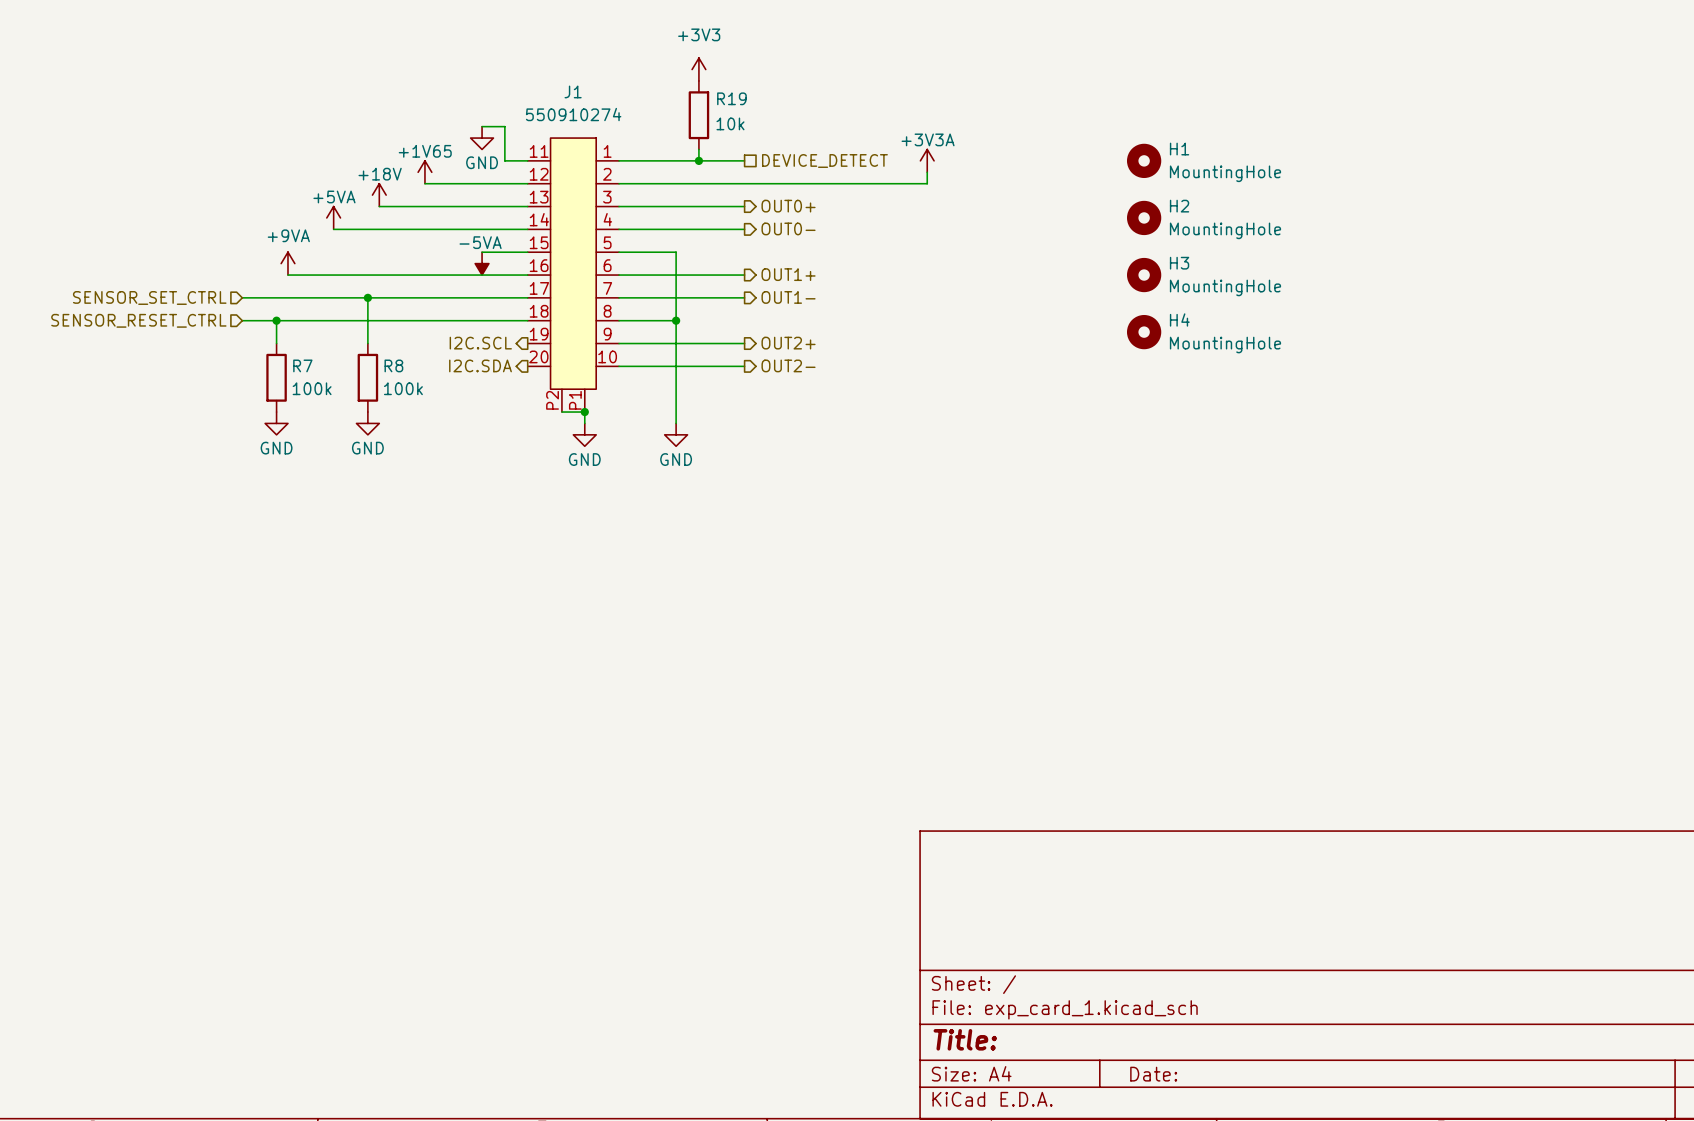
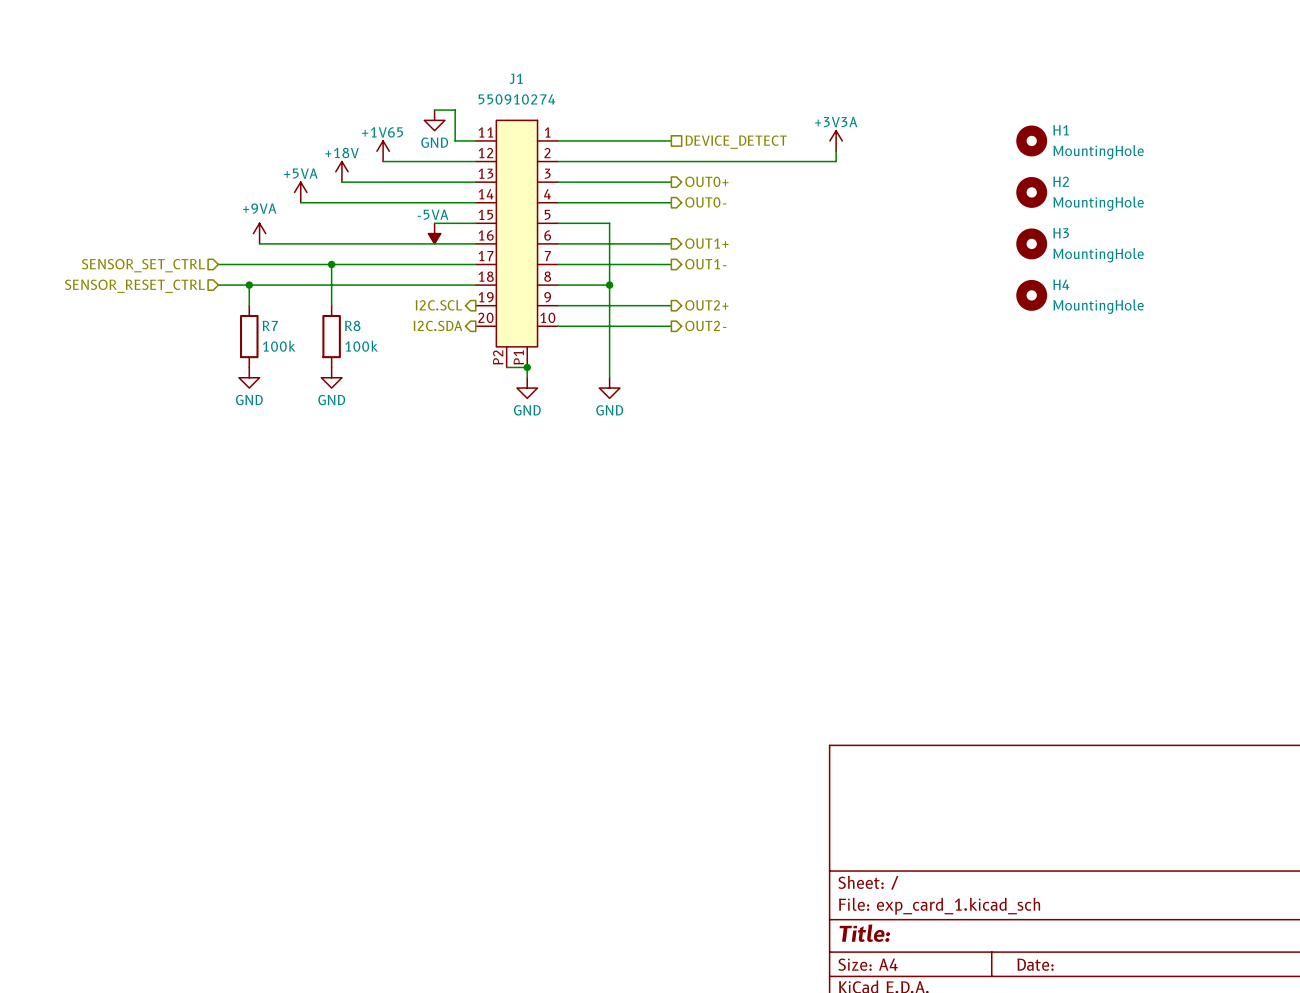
power symbol: +3V3 (698, 69) -> none
R19: 10k (698, 115) -> none
wire: (698, 149) (698, 160) -> none
junction: (698, 160) -> none

